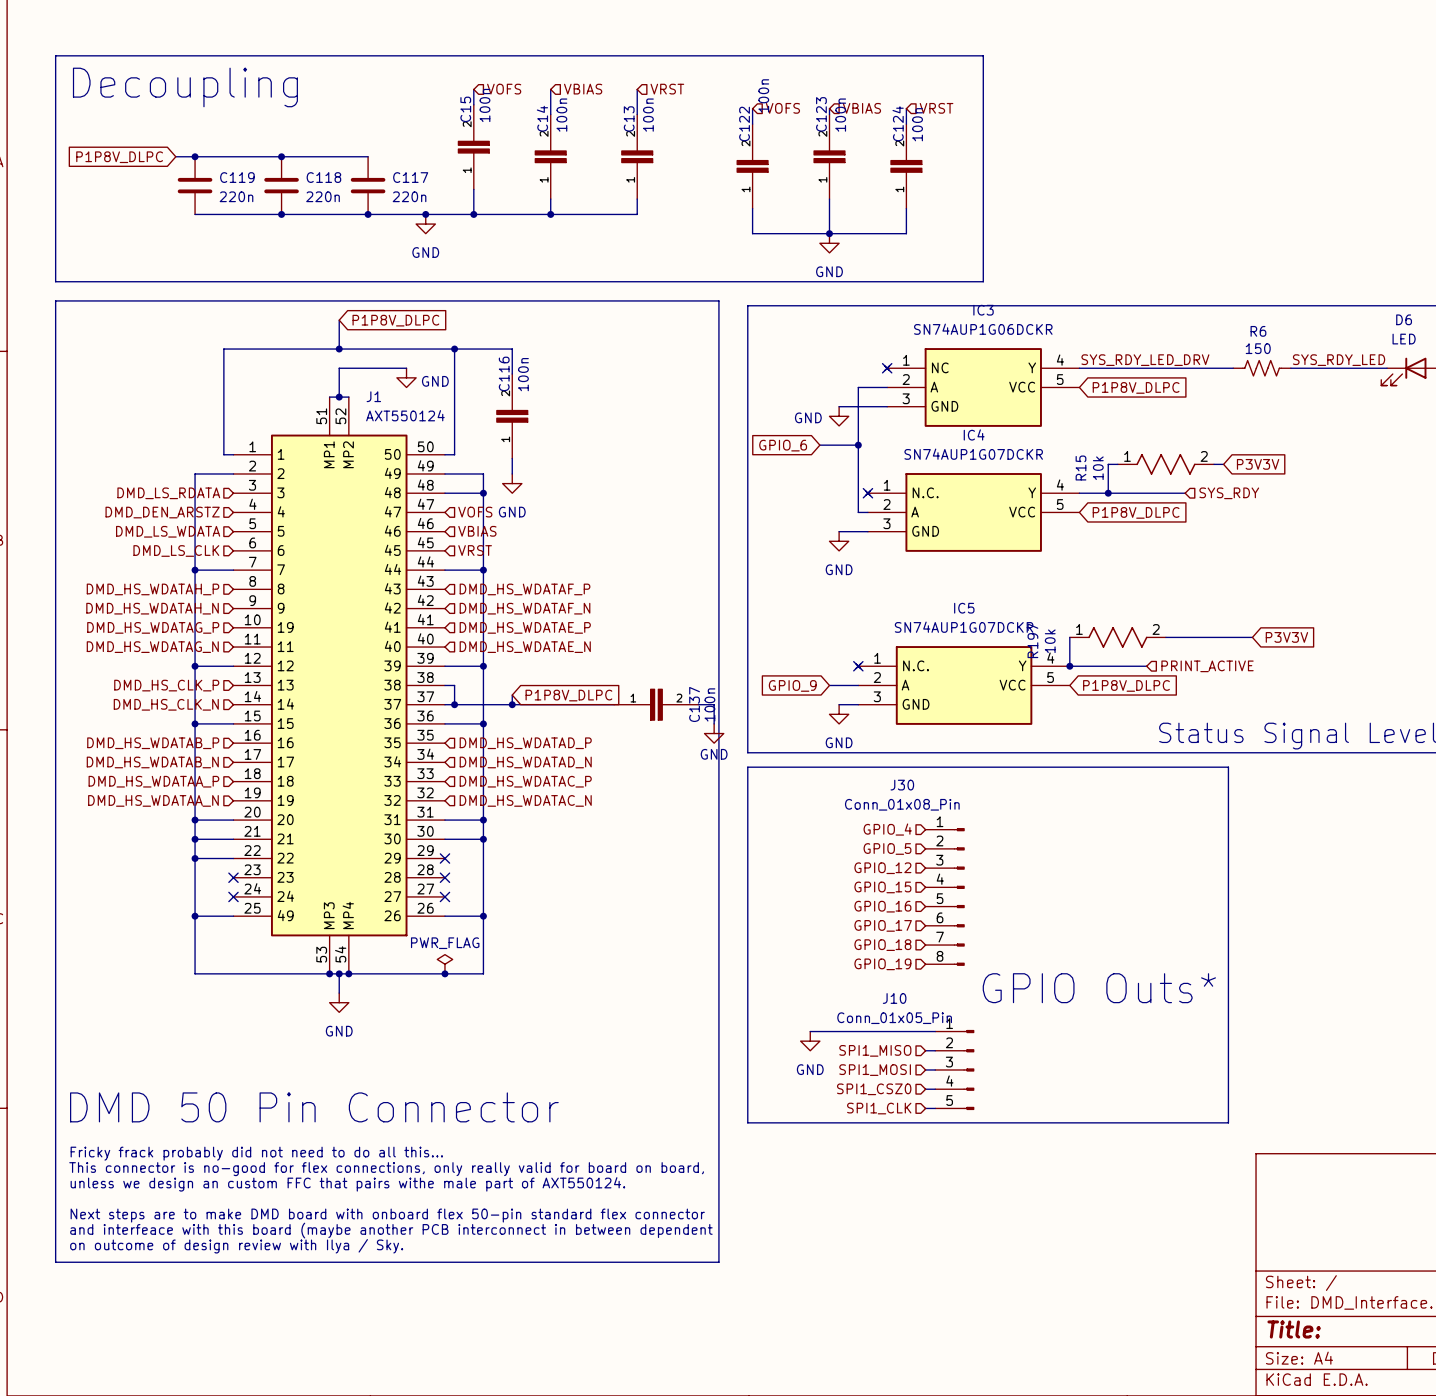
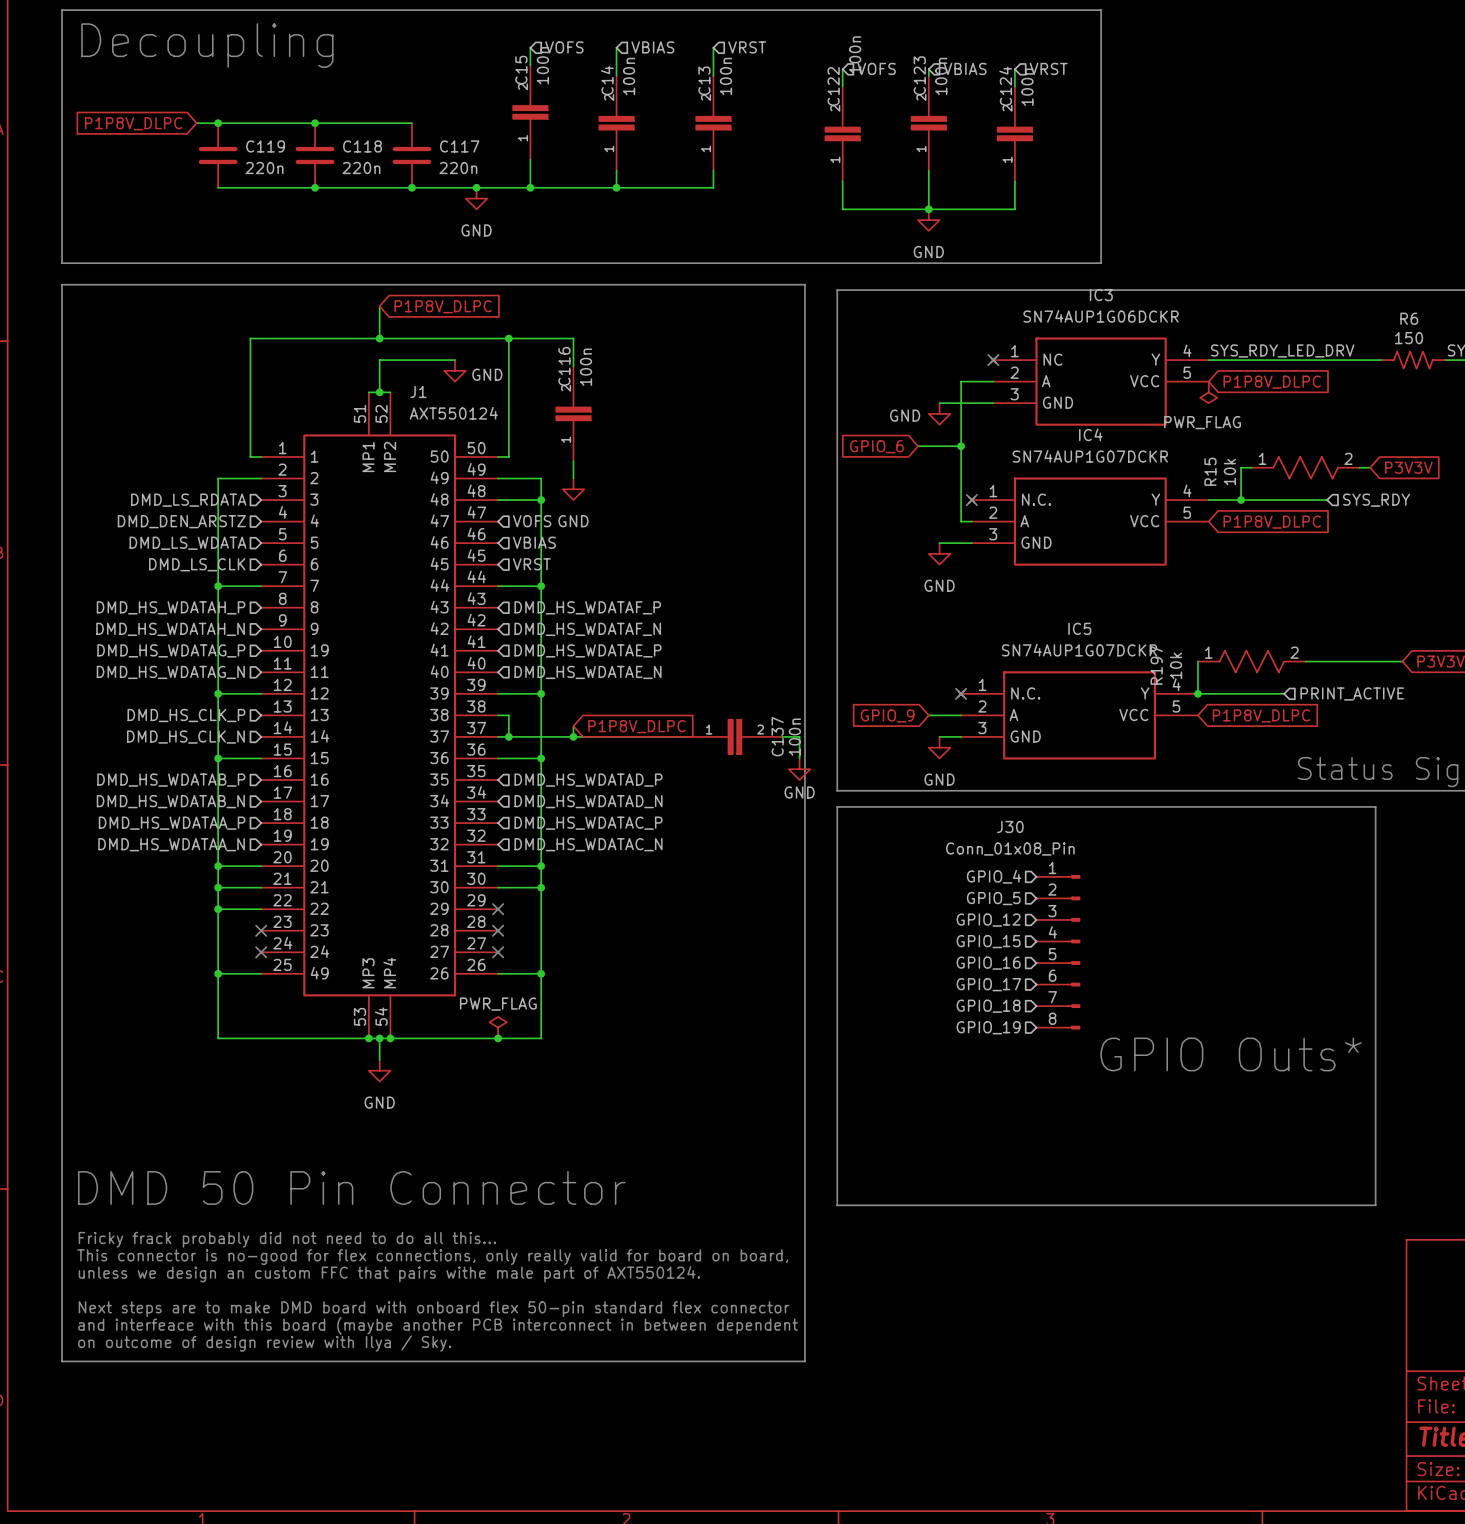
power symbol: none -> PWR_FLAG (1208, 392)
wire: (810, 1031) (935, 1031) -> none
power symbol: GND (810, 1041) -> none
hierarchical label: SPI1_MISO (875, 1050) -> none
wire: (925, 1050) (935, 1050) -> none
wire: (925, 1069) (935, 1069) -> none
J10: Conn_01x05_Pin (954, 1069) -> none
hierarchical label: SPI1_MOSI (875, 1070) -> none
hierarchical label: SPI1_CSZ0 (874, 1089) -> none
wire: (925, 1089) (935, 1089) -> none
hierarchical label: SPI1_CLK (879, 1108) -> none
wire: (925, 1108) (935, 1108) -> none

